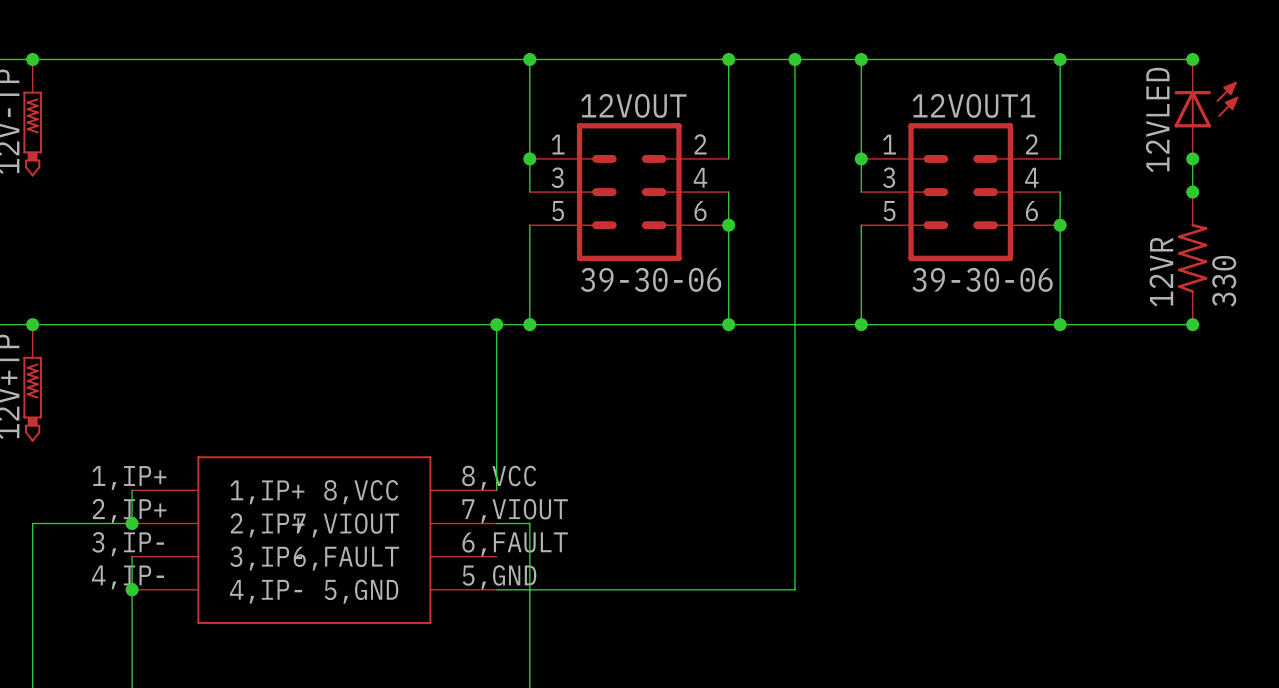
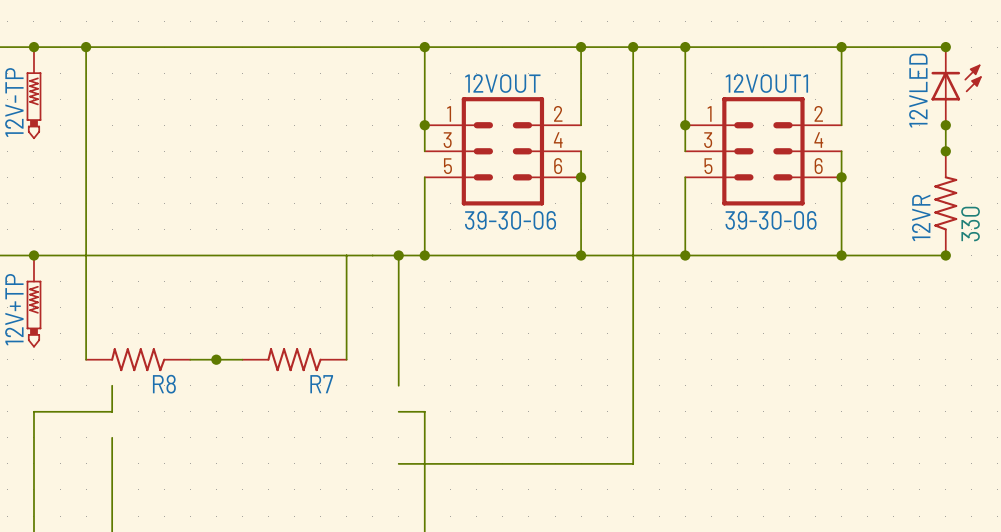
wire: none -> (86, 47) (86, 359)
junction: none -> (86, 47)
wire: none -> (346, 255) (346, 359)
R8: none -> (138, 359)
junction: none -> (216, 359)
R7: none -> (294, 359)
junction: (132, 523) -> none
part: (314, 540) -> none
junction: (132, 589) -> none

